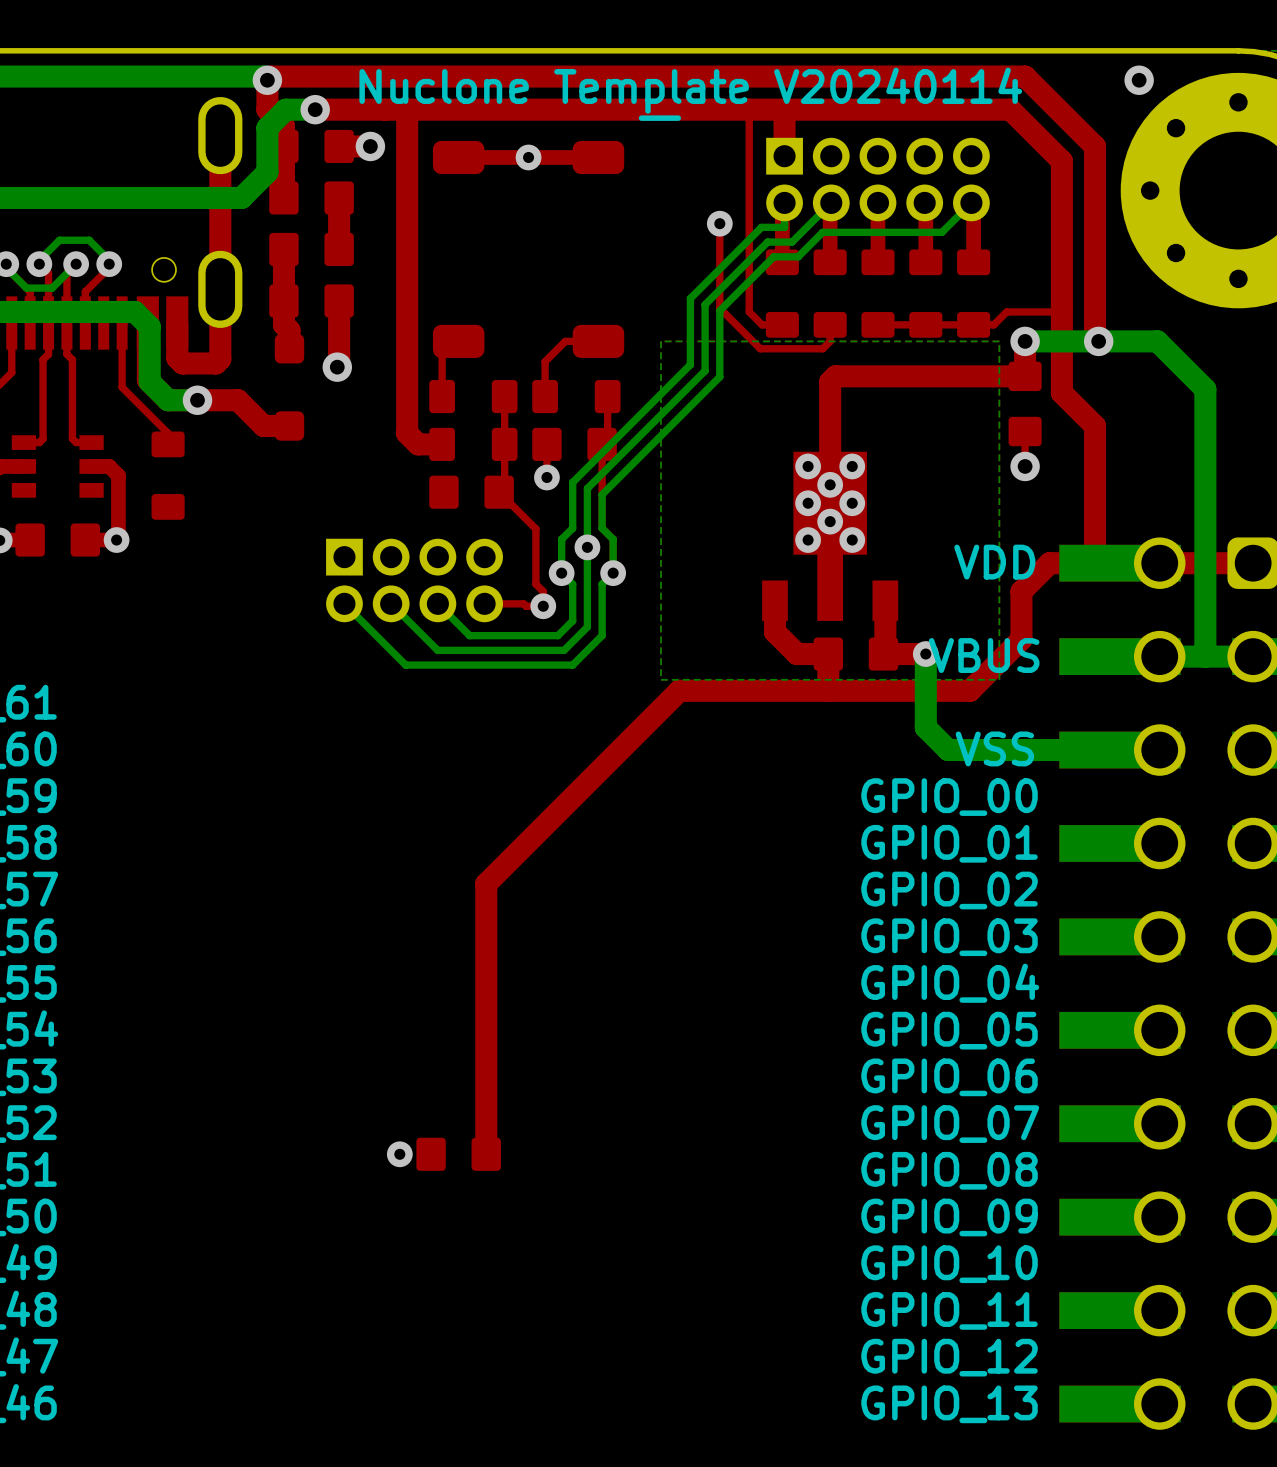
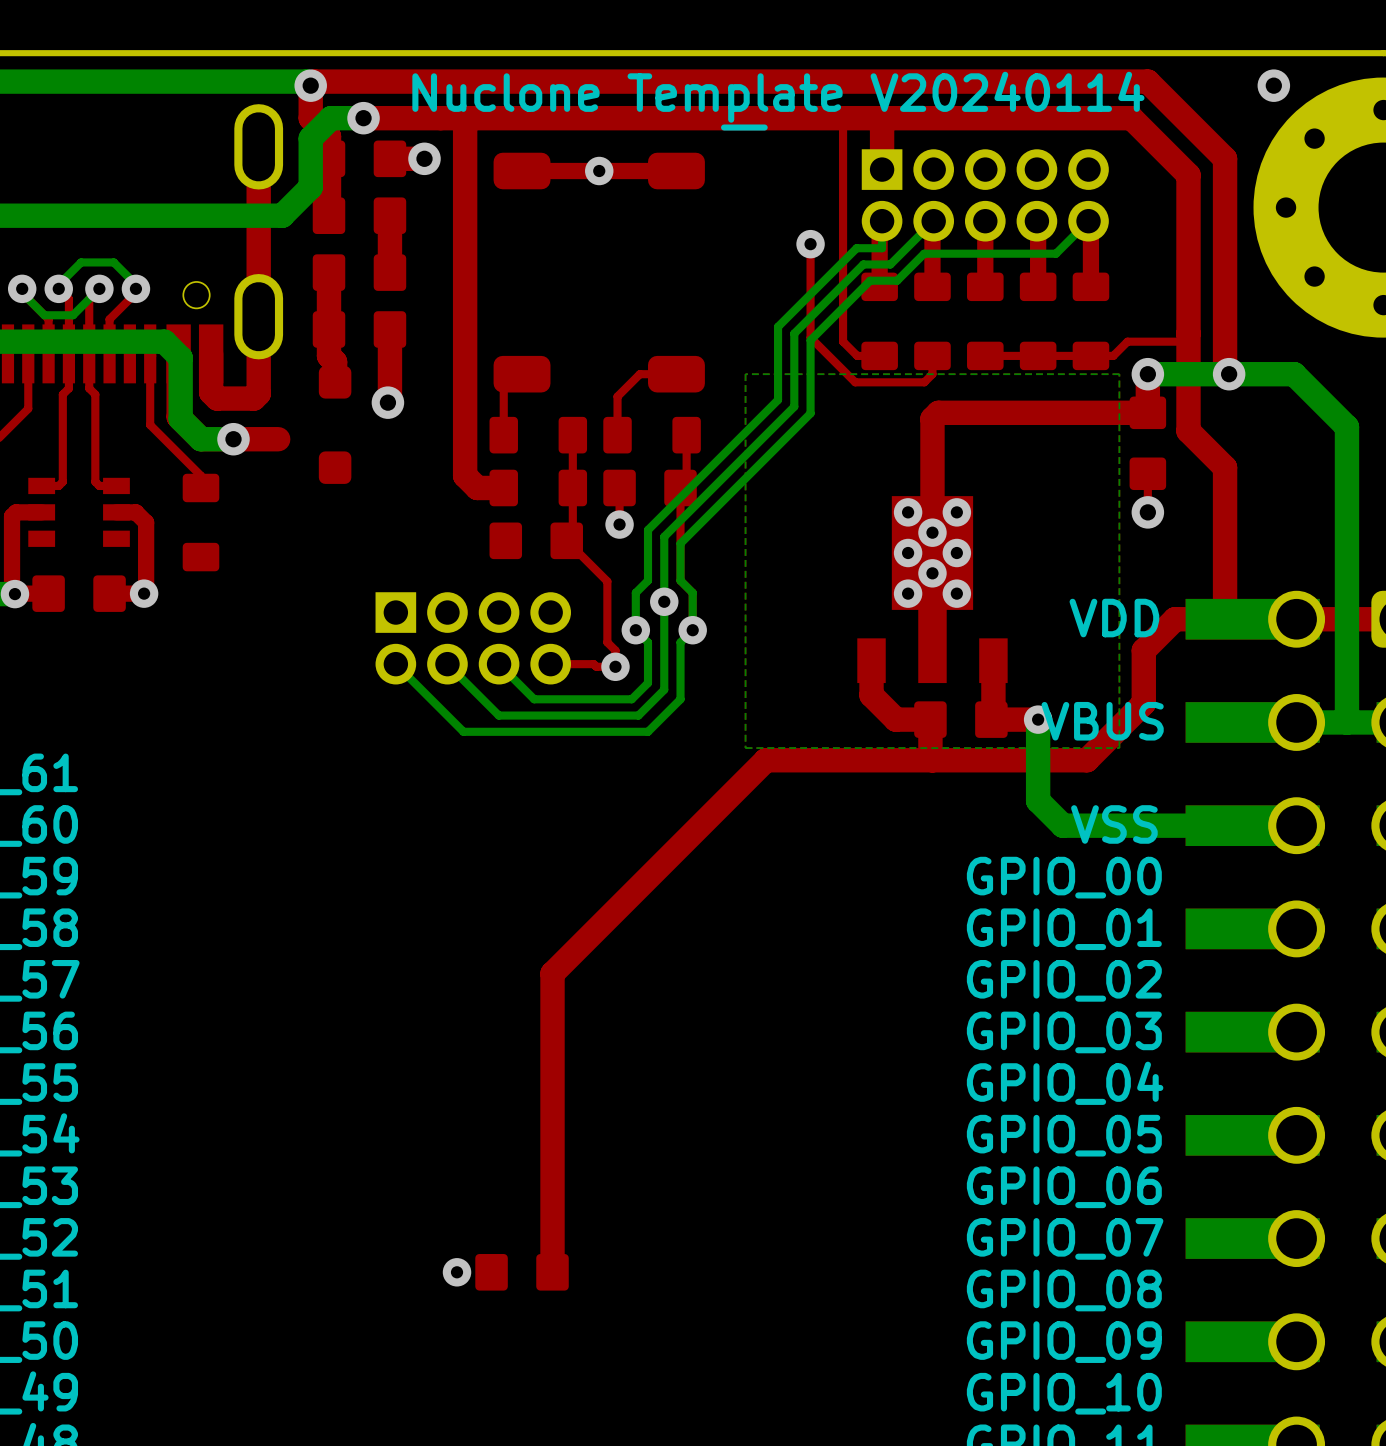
top track: (237, 400) (263, 426) (289, 426) -> none

